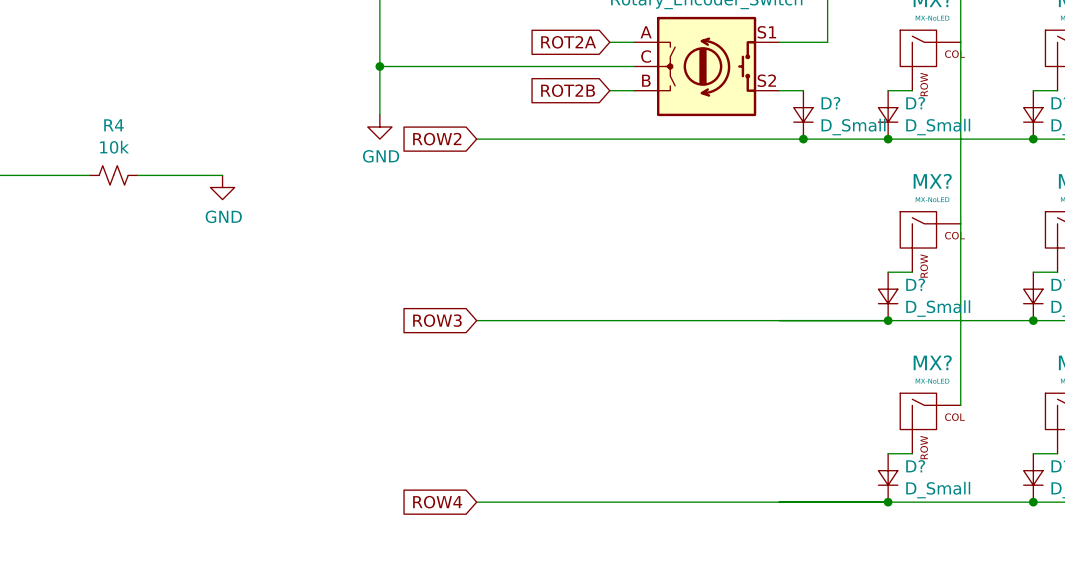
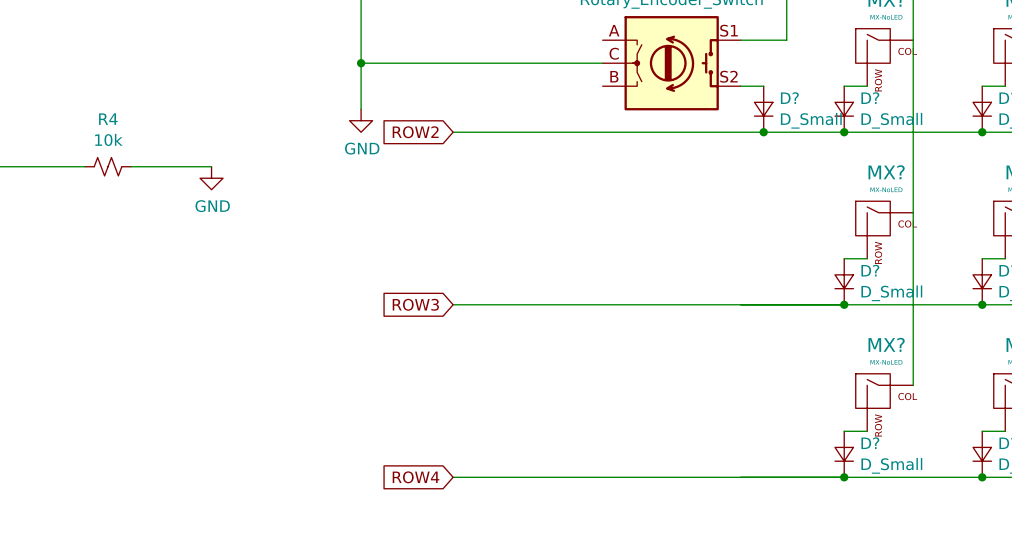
global label: ROT2A (568, 42) -> none
wire: (609, 42) (634, 42) -> none
global label: ROT2B (568, 90) -> none
wire: (609, 90) (634, 90) -> none

